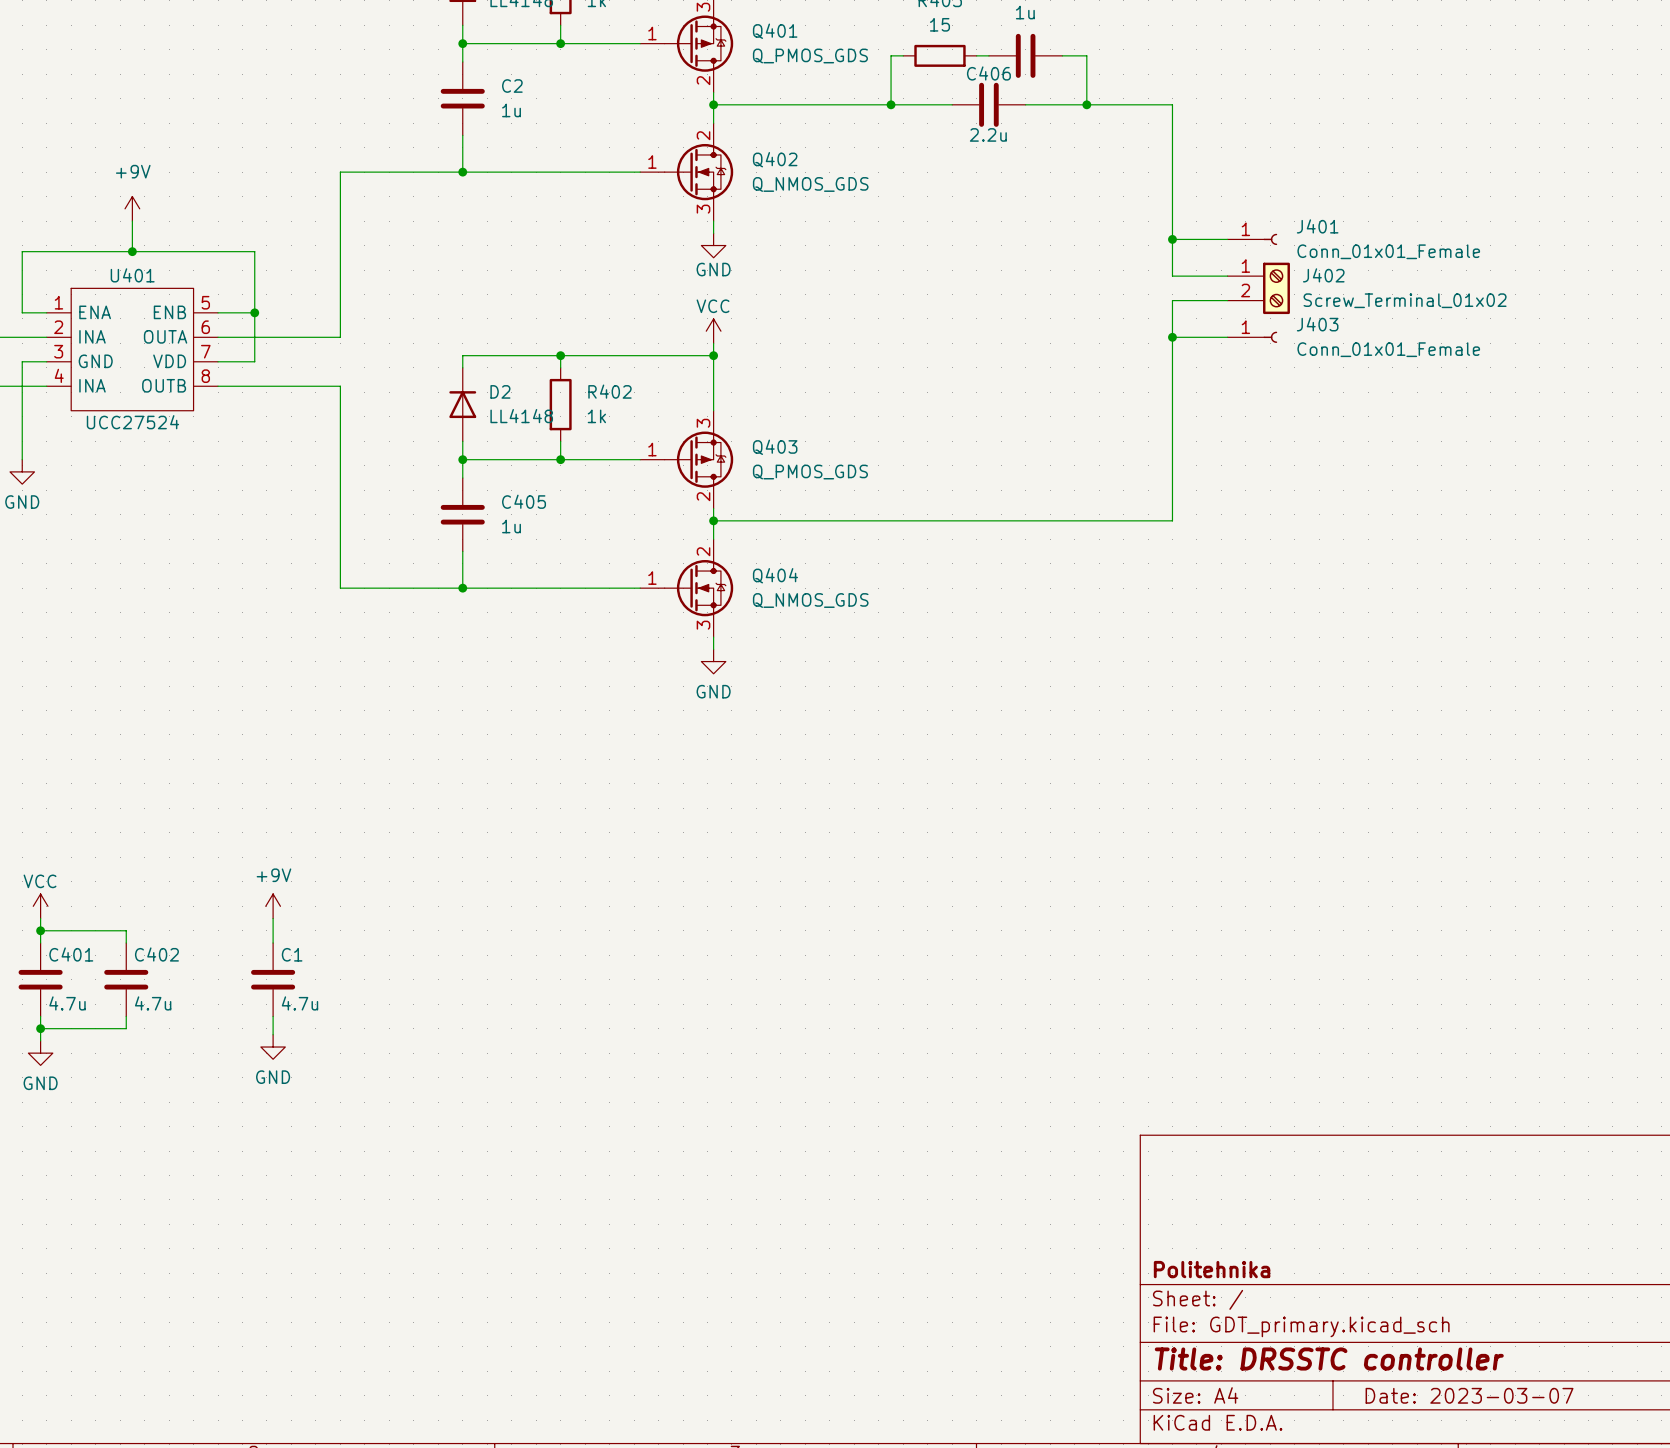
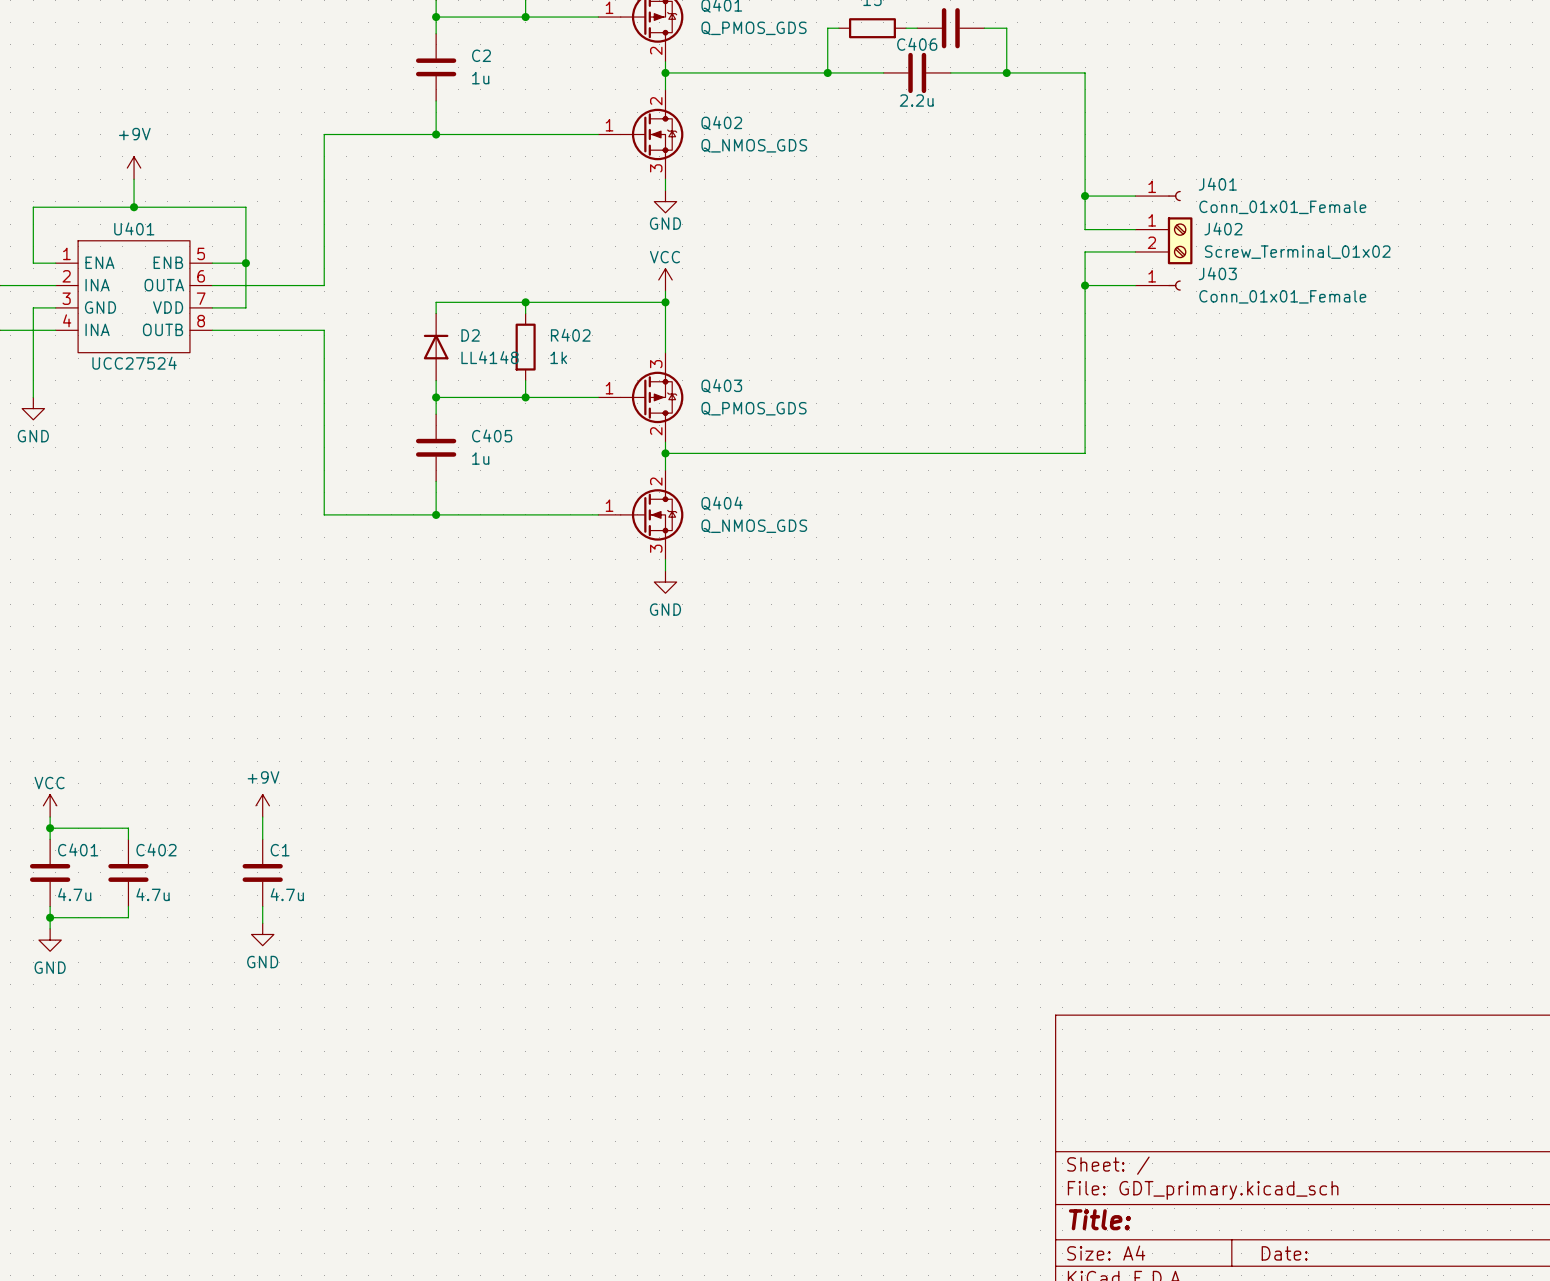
title block: Politehnika (1212, 1269) -> none
title block: Title: DRSSTC controller (1329, 1359) -> Title: (1099, 1219)
title block: Date: 2023-03-07 (1469, 1395) -> Date: (1284, 1253)

